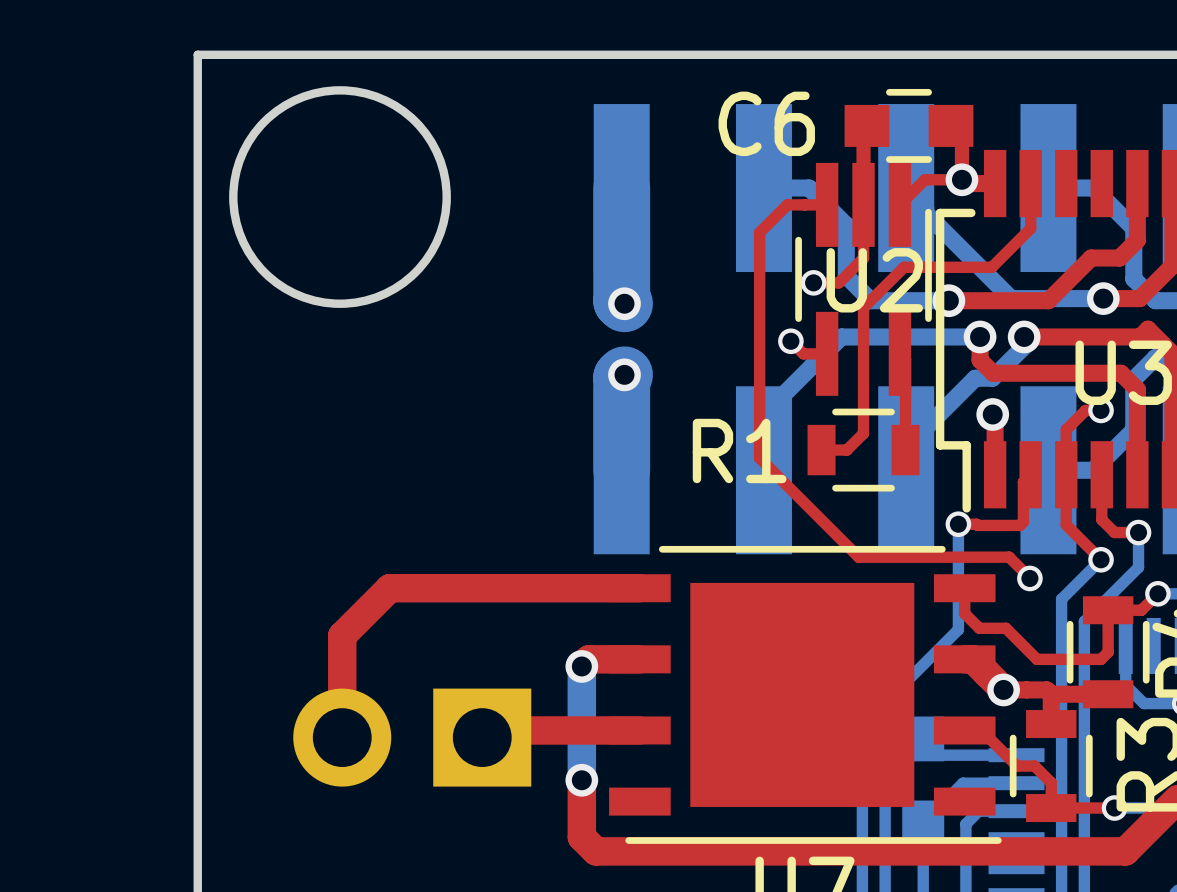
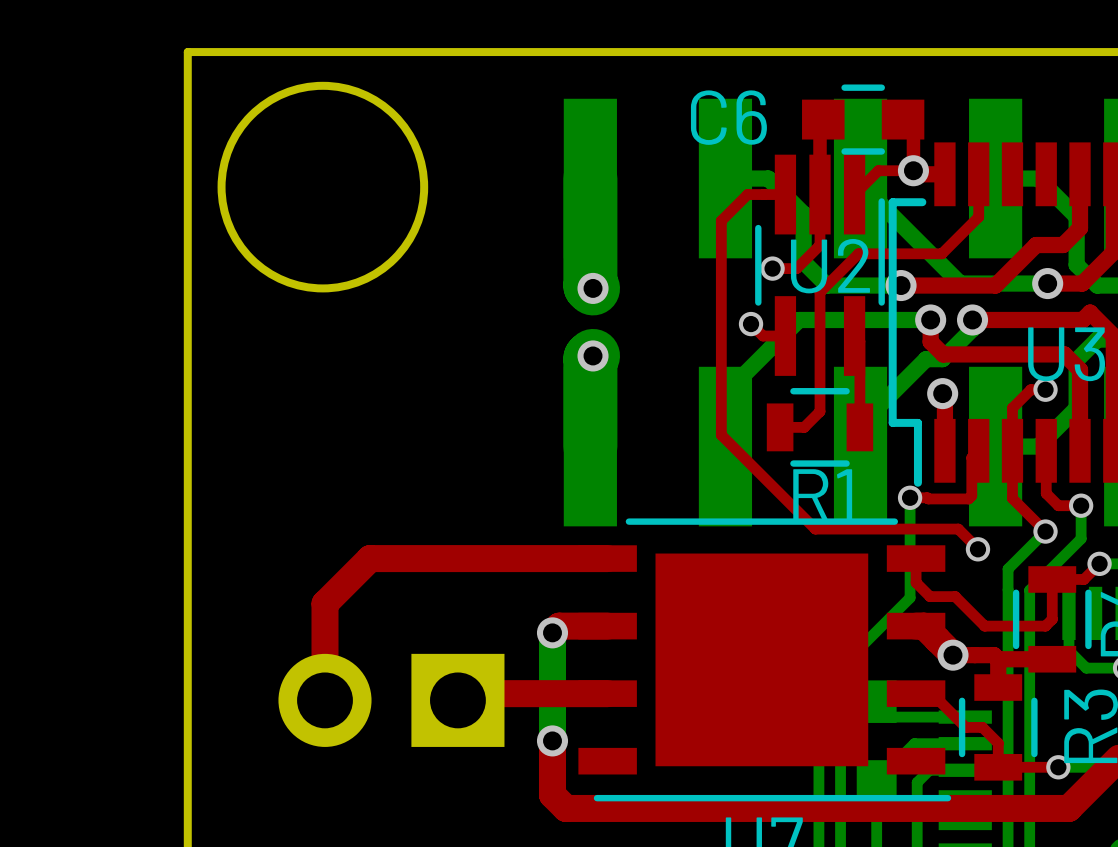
R1 name position: R1 (739, 451) -> R1 (822, 495)

